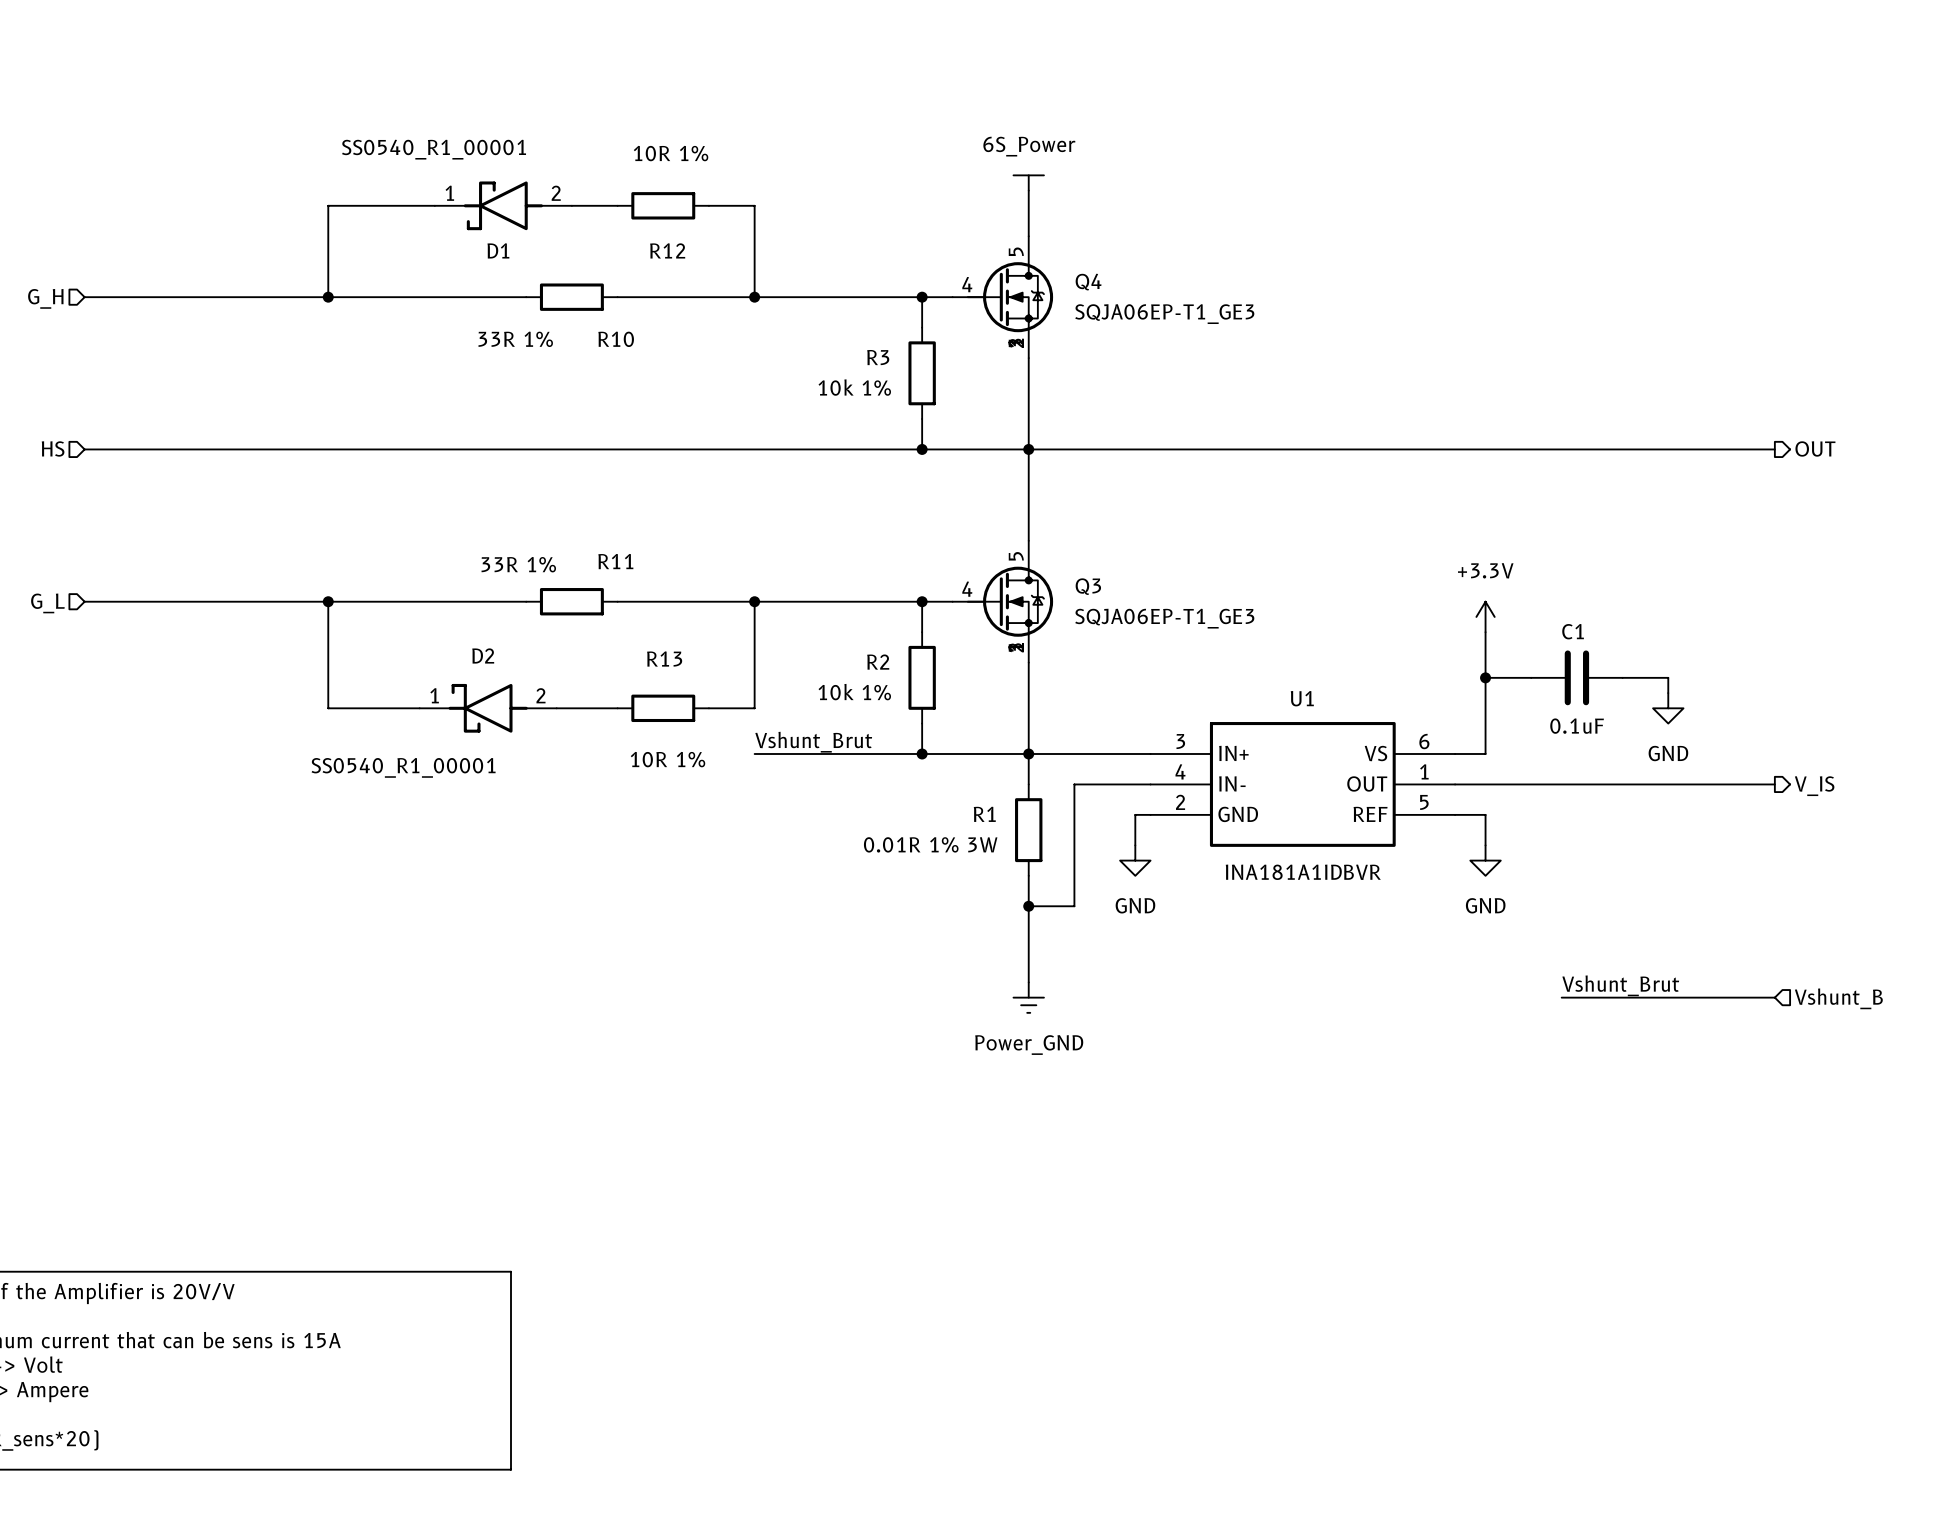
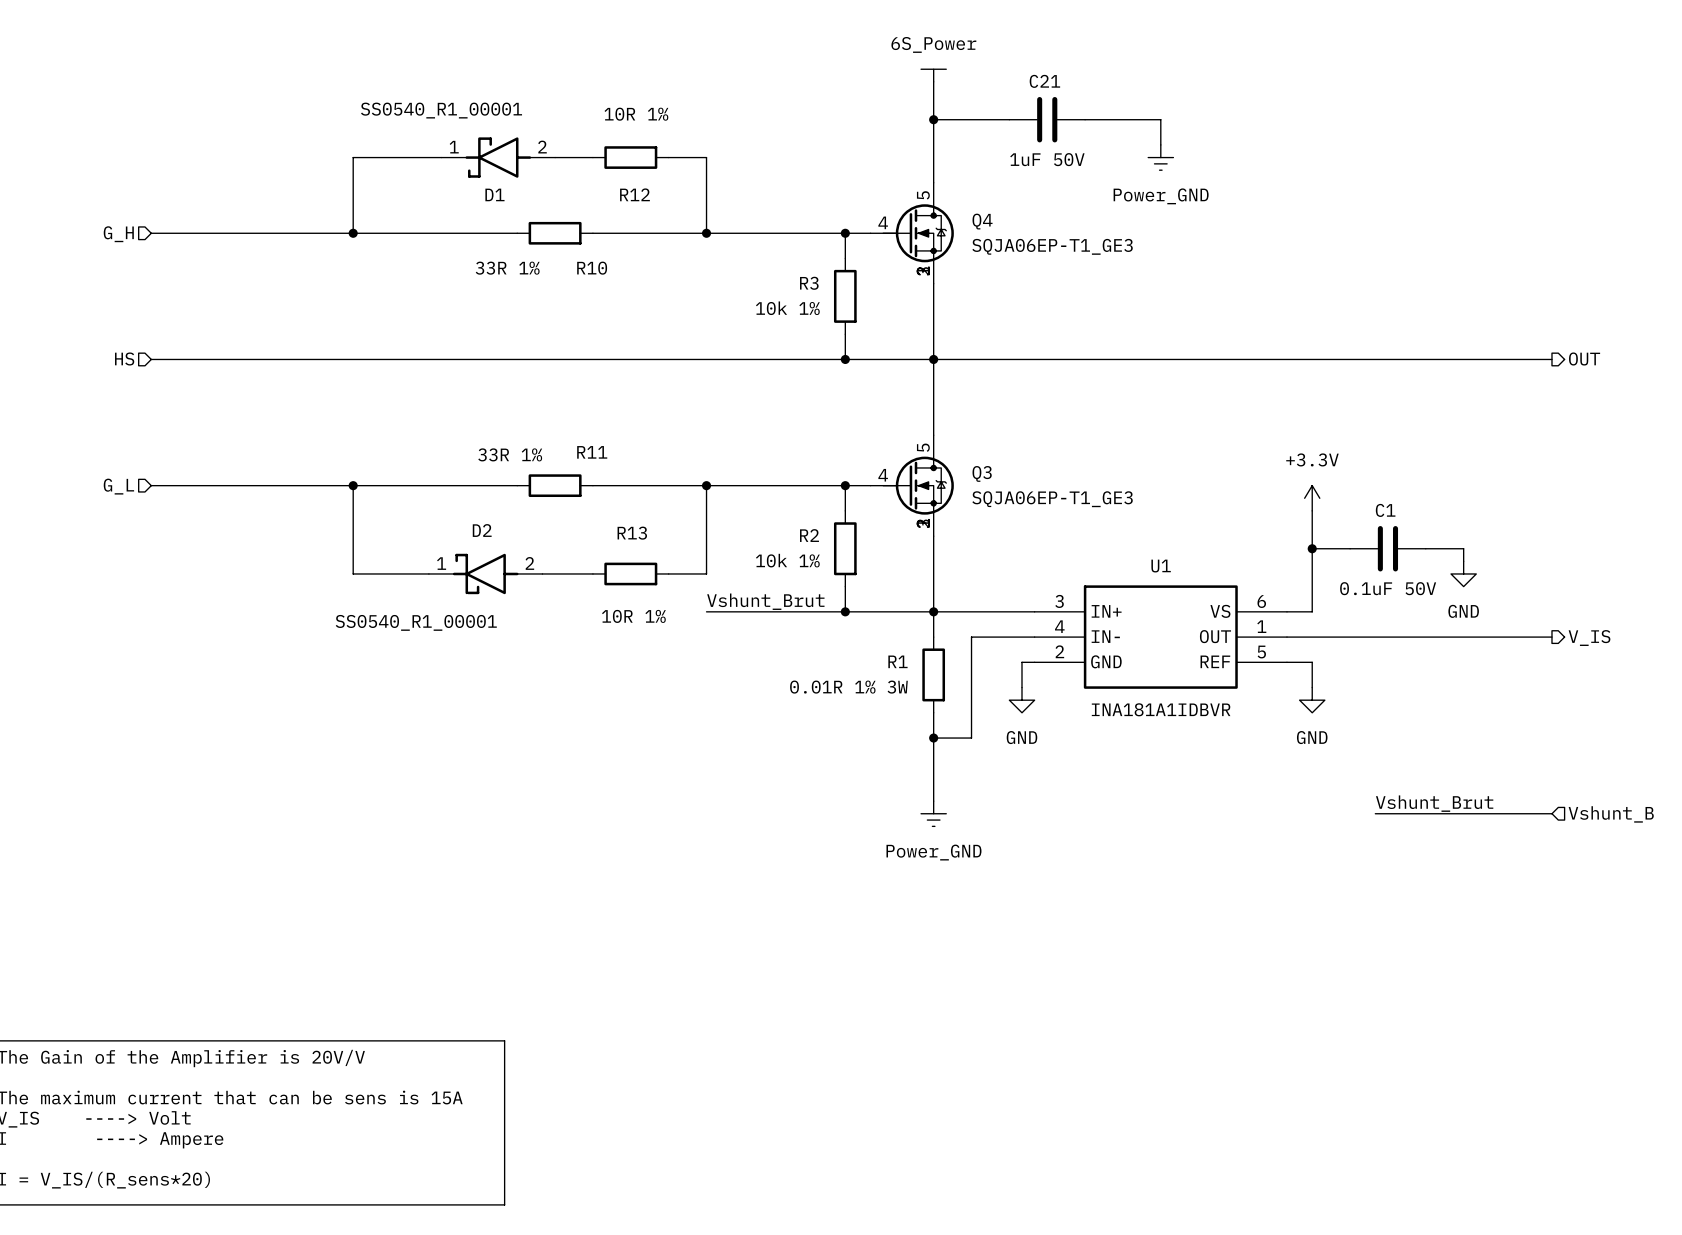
wire: none -> (933, 81) (933, 144)
wire: none -> (933, 119) (1009, 119)
junction: none -> (933, 119)
C21: none -> 1uF 50V (1047, 119)
wire: none -> (1085, 119) (1160, 119) (1160, 144)
power symbol position: 6S_Power (1028, 182) -> 6S_Power (933, 75)
power symbol: none -> Power_GND (1160, 157)
C1 value: 0.1uF (1577, 726) -> 0.1uF 50V (1388, 588)

